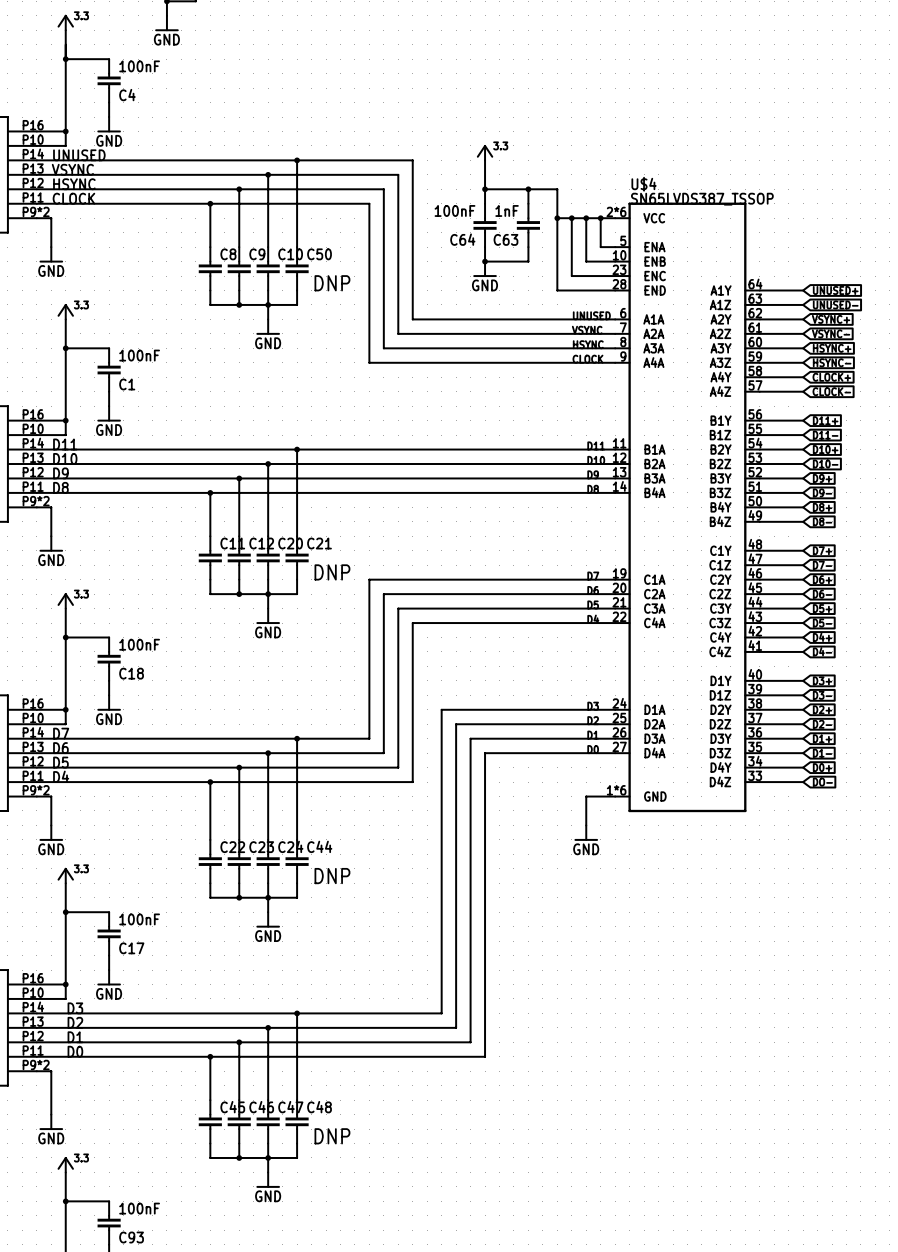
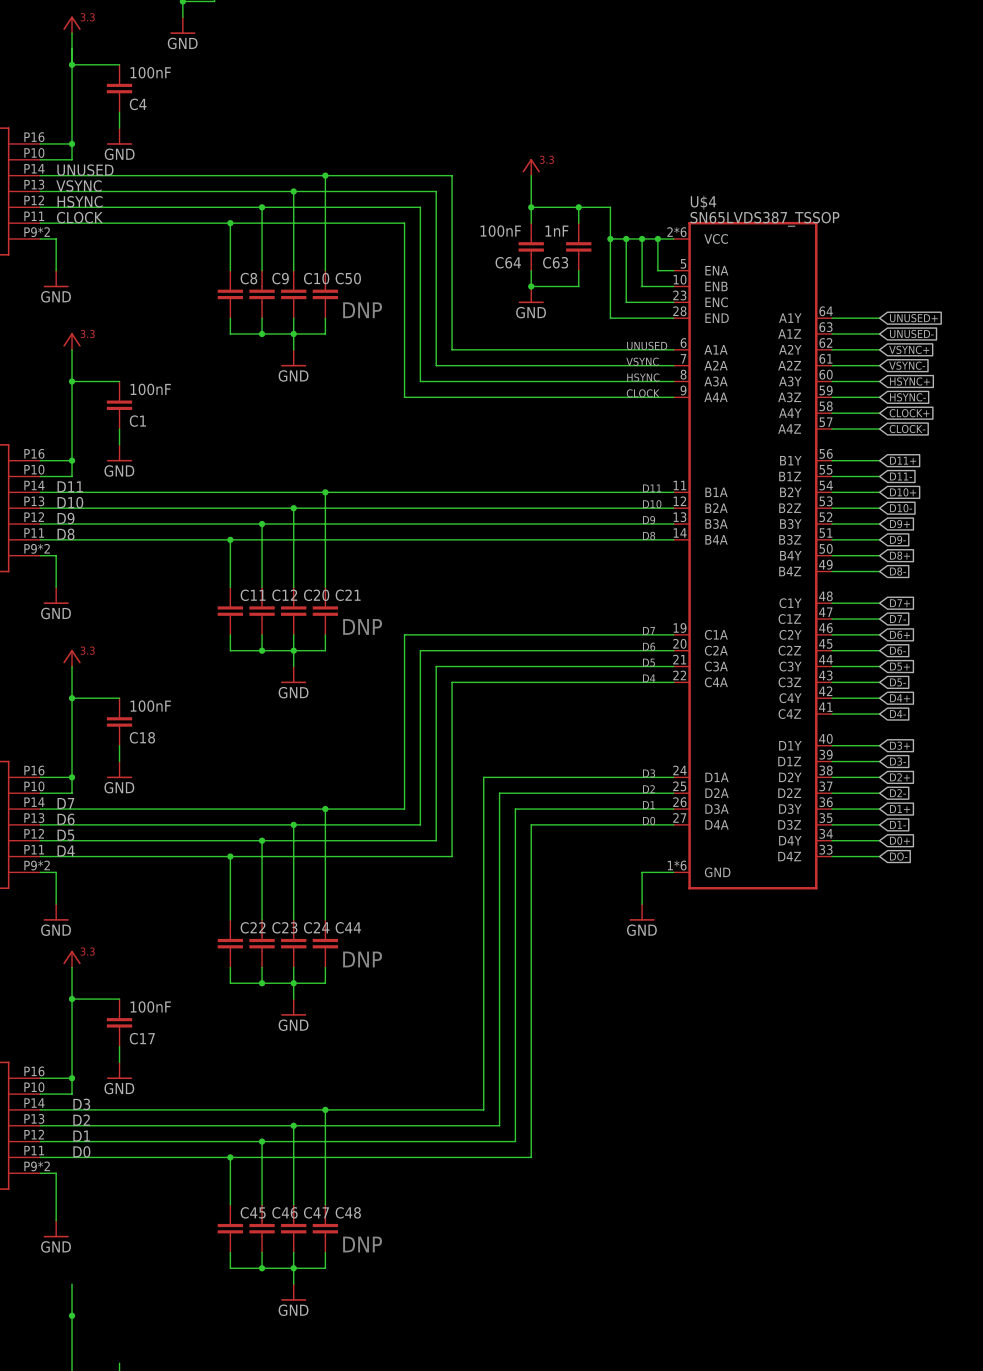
power symbol: (65, 1164) -> none
wire: (65, 1201) (109, 1201) -> none
C93: 100nF (109, 1223) -> none

